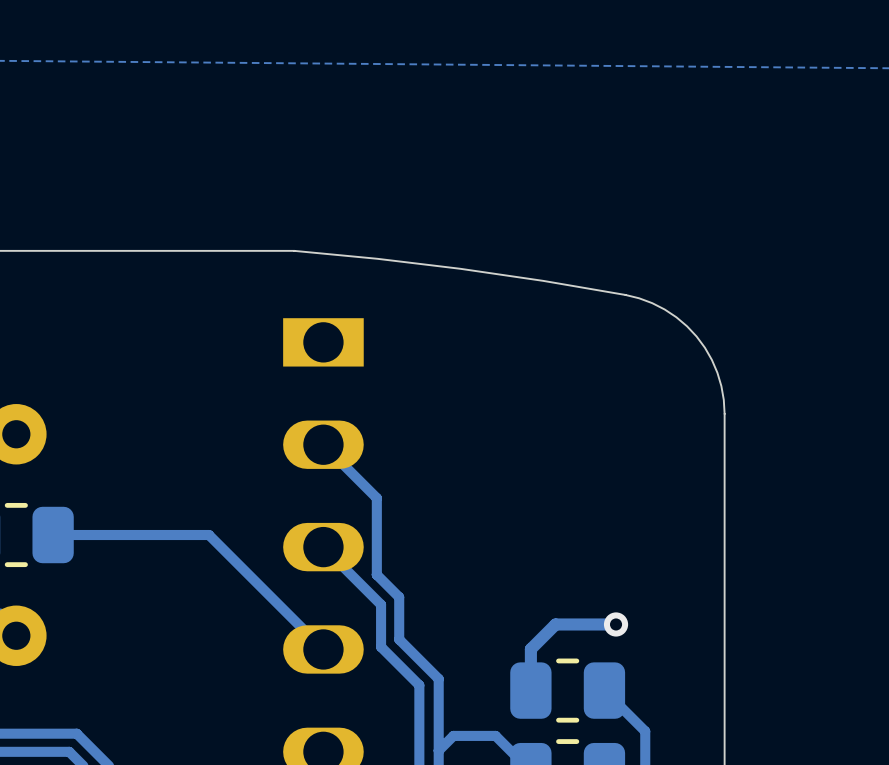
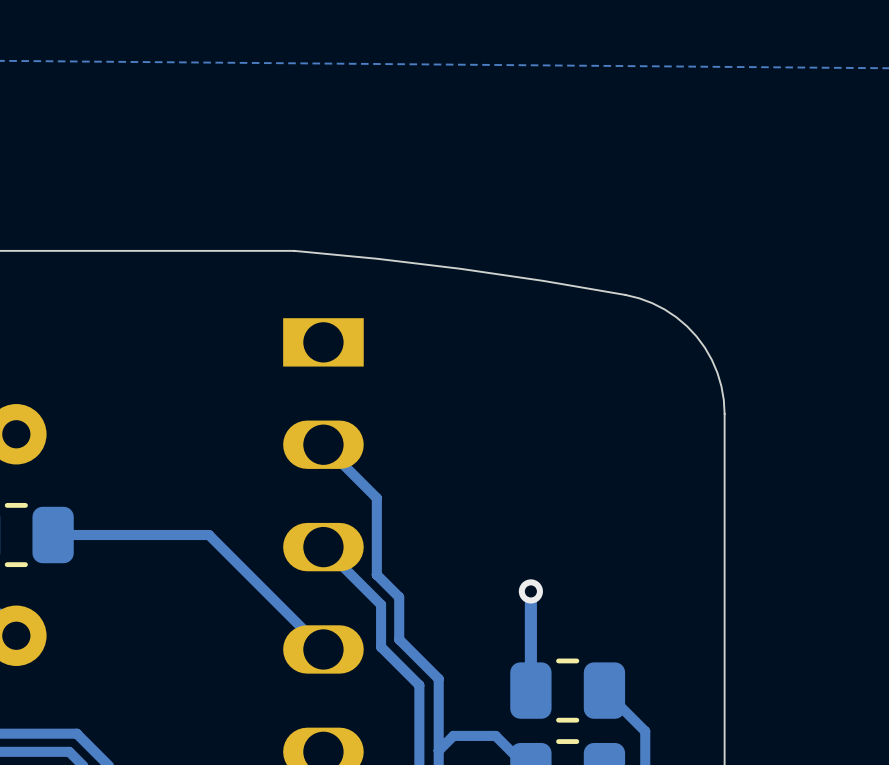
track: (616, 624) (555, 624) (530, 649) -> (530, 591) (530, 649)
via position: (616, 624) -> (530, 591)

